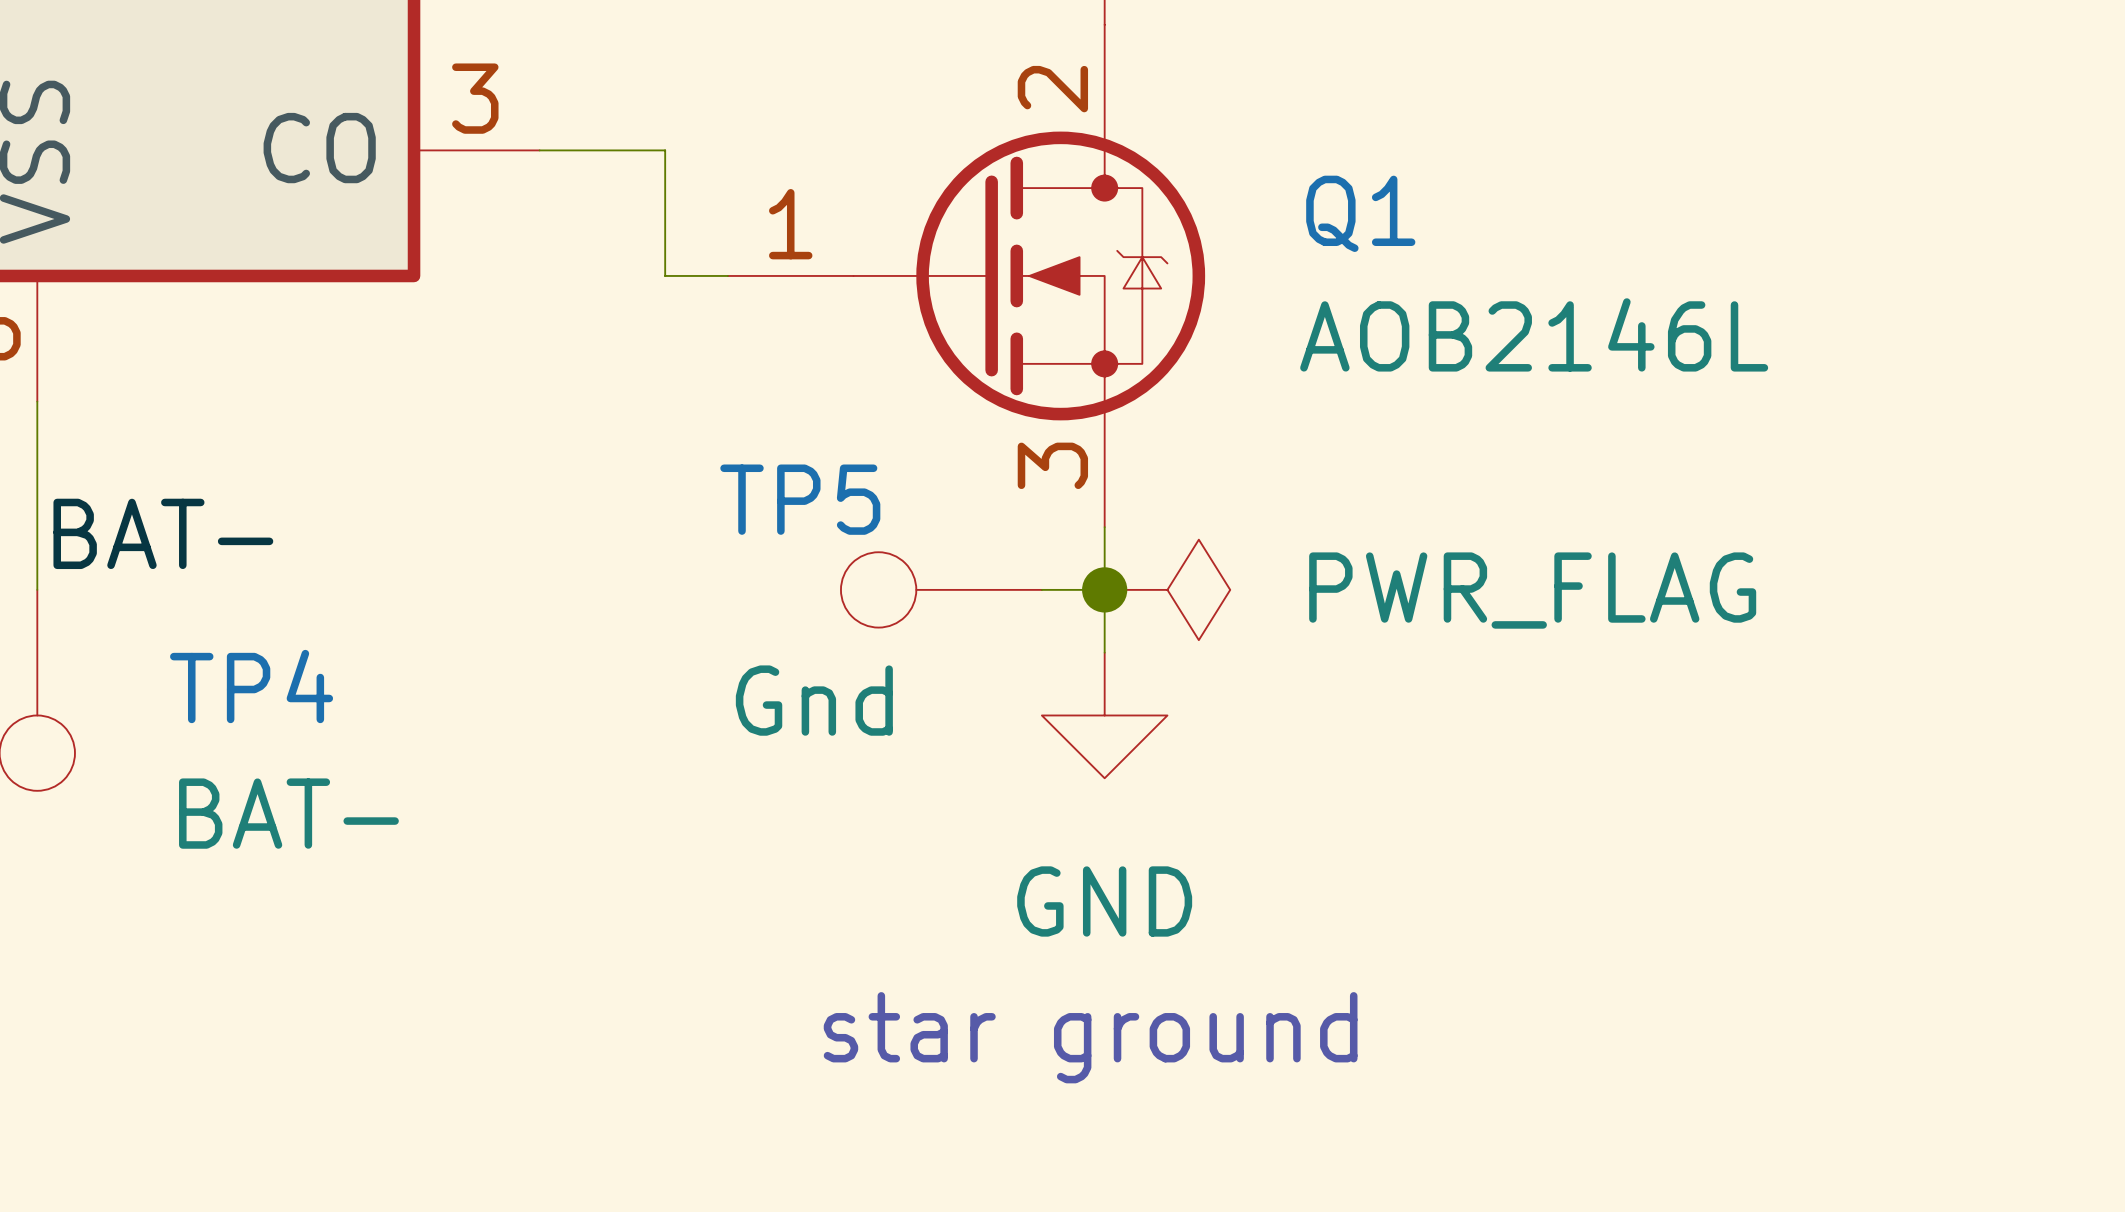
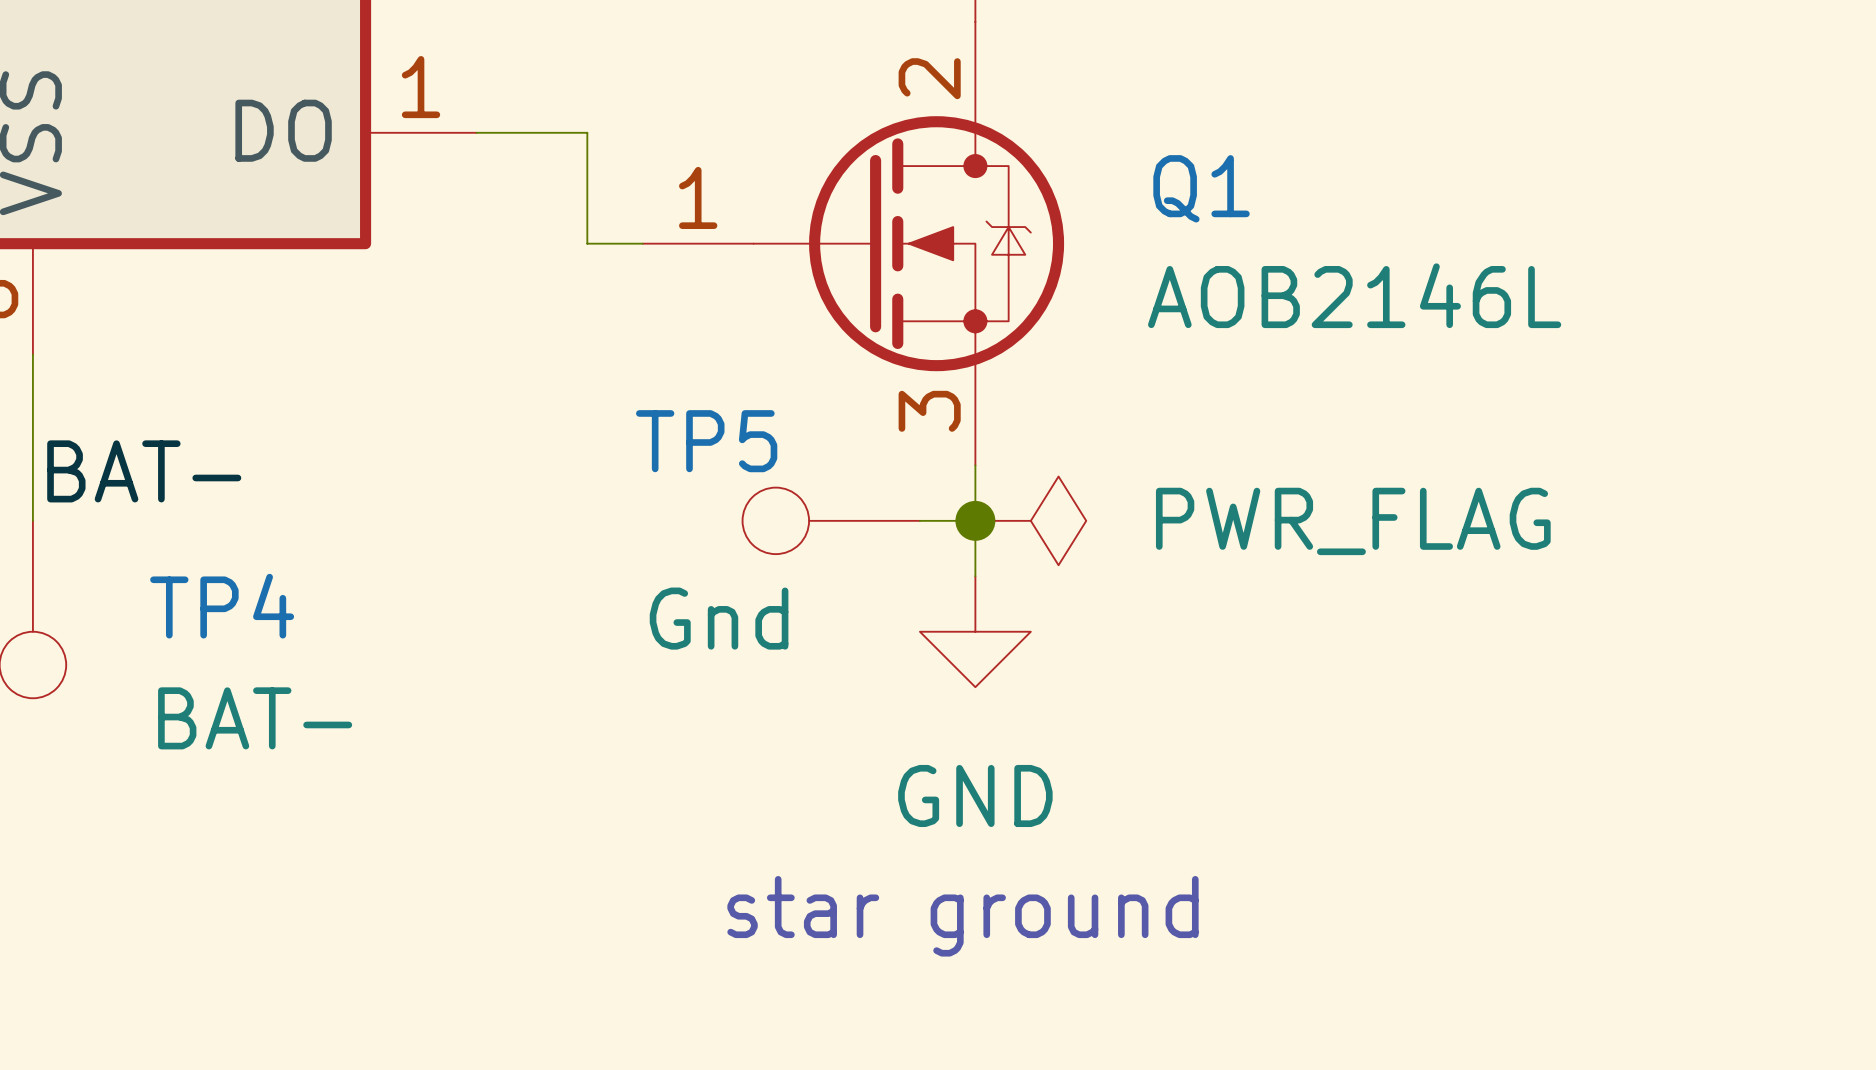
part pin number: 3 (475, 98) -> 1 (421, 87)
part pin name: CO (319, 148) -> DO (283, 130)

